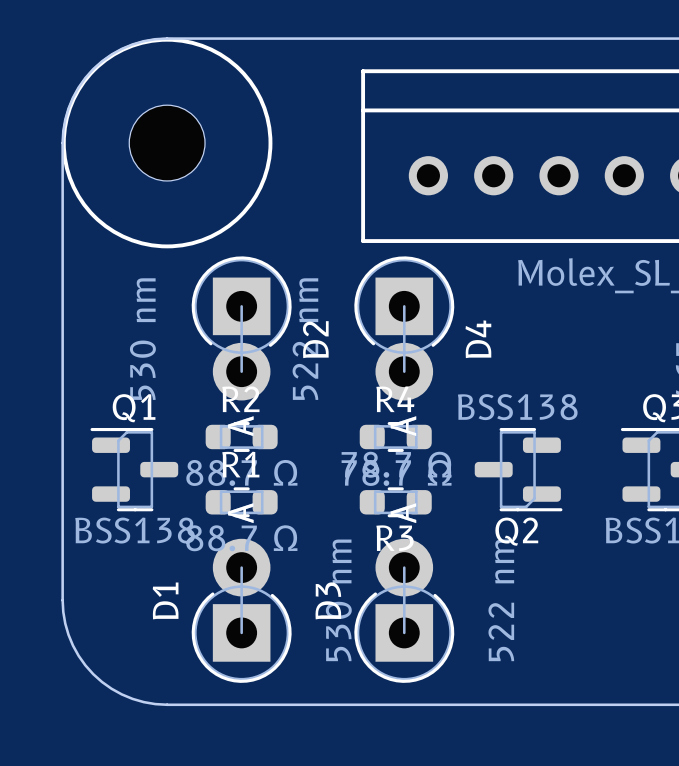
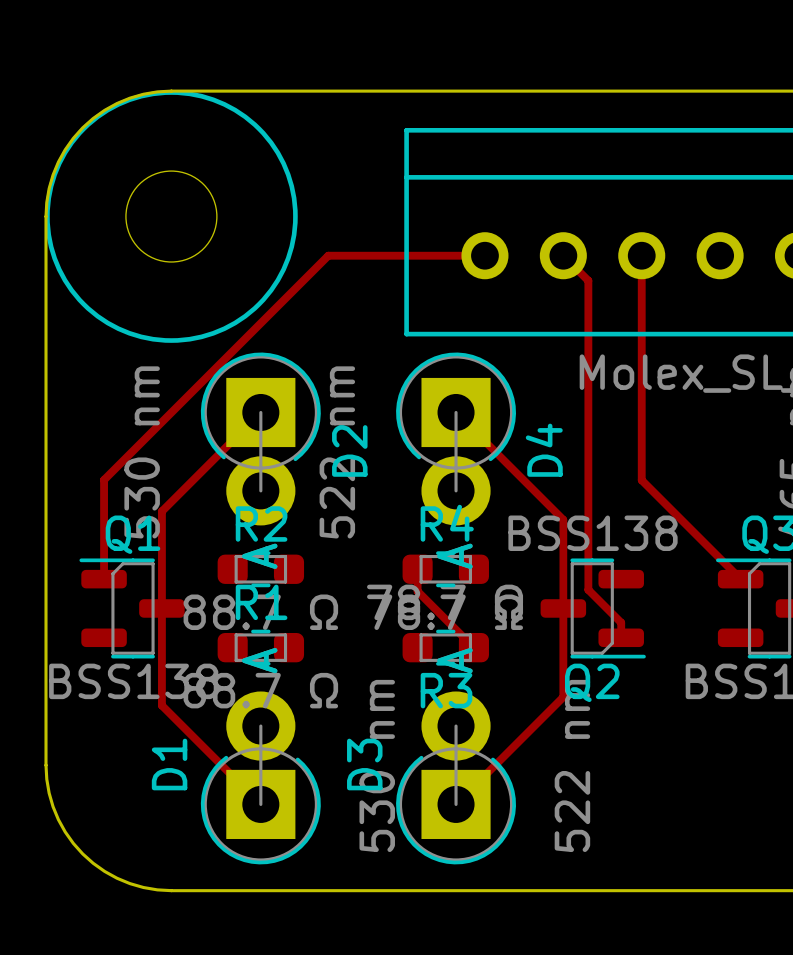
track: none -> (484, 255) (328, 255) (104, 479) (104, 579)
track: none -> (563, 255) (588, 280) (588, 589) (621, 622) (621, 637)
track: none -> (641, 255) (641, 480) (740, 579)
track: none -> (260, 412) (161, 511) (161, 705) (260, 804)
track: none -> (456, 427) (456, 412) (563, 519) (563, 697) (456, 804)
track: none -> (417, 569) (417, 591) (473, 647)

